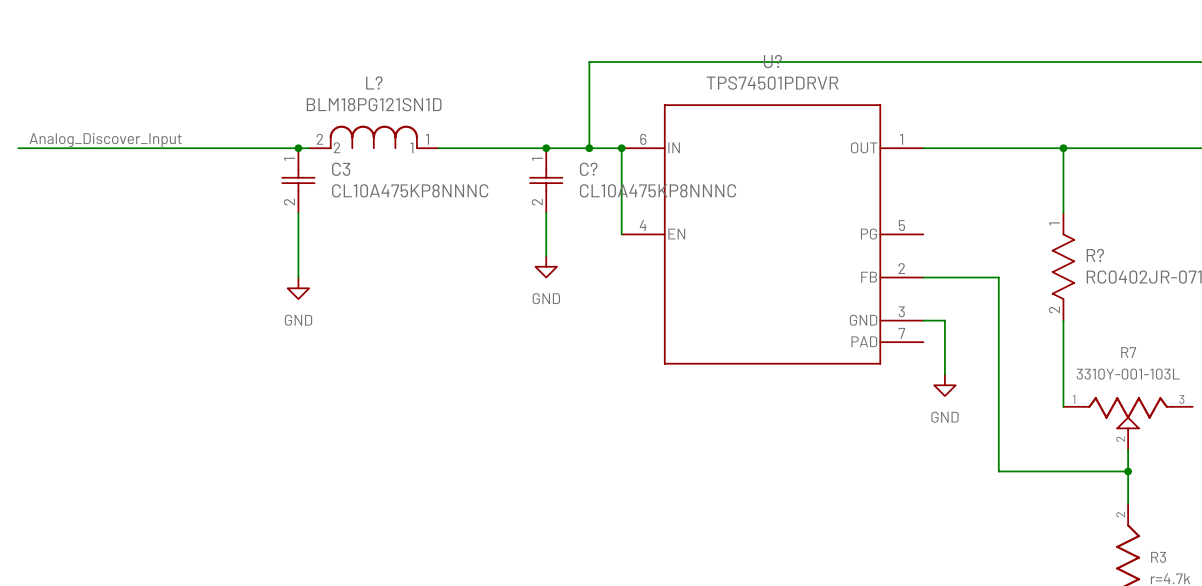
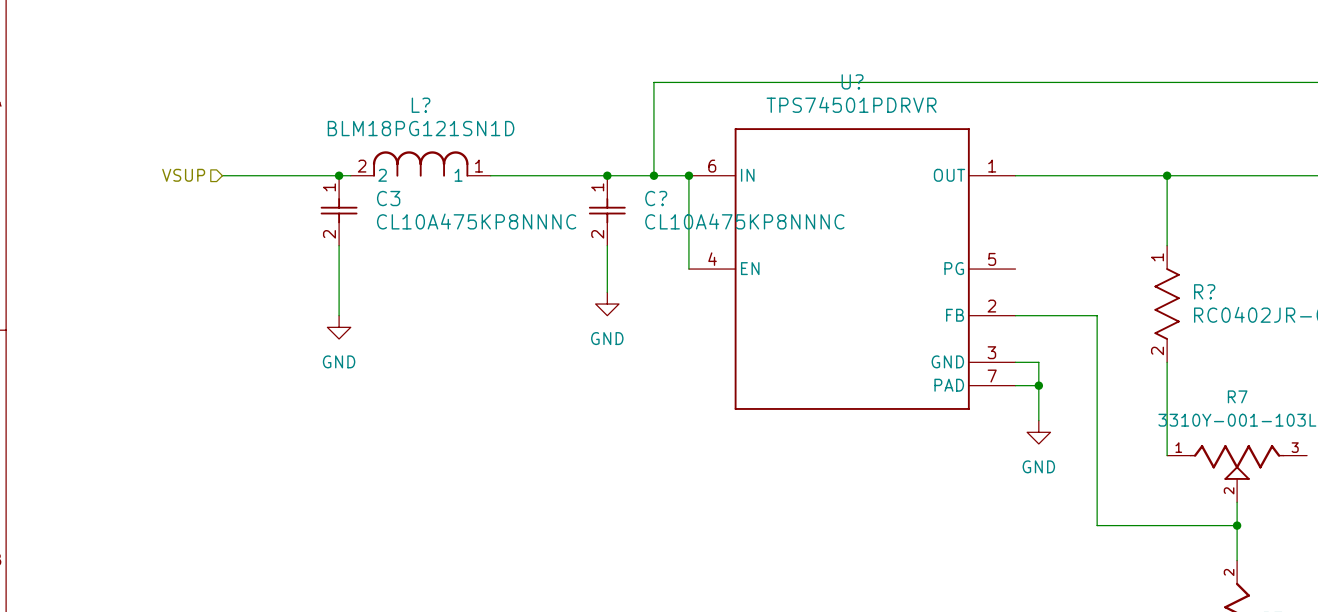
label: Analog_Discover_Input (105, 140) -> none
hierarchical label: none -> VSUP (183, 175)
wire: (18, 148) (190, 148) -> none
wire: none -> (1015, 385) (1038, 385)
junction: none -> (1038, 385)

